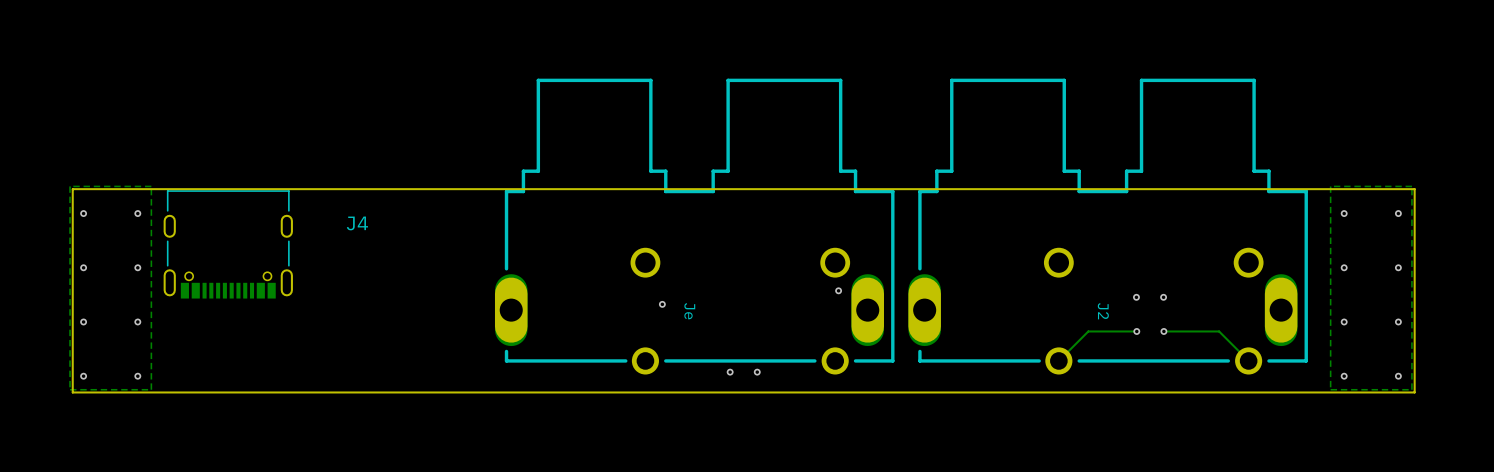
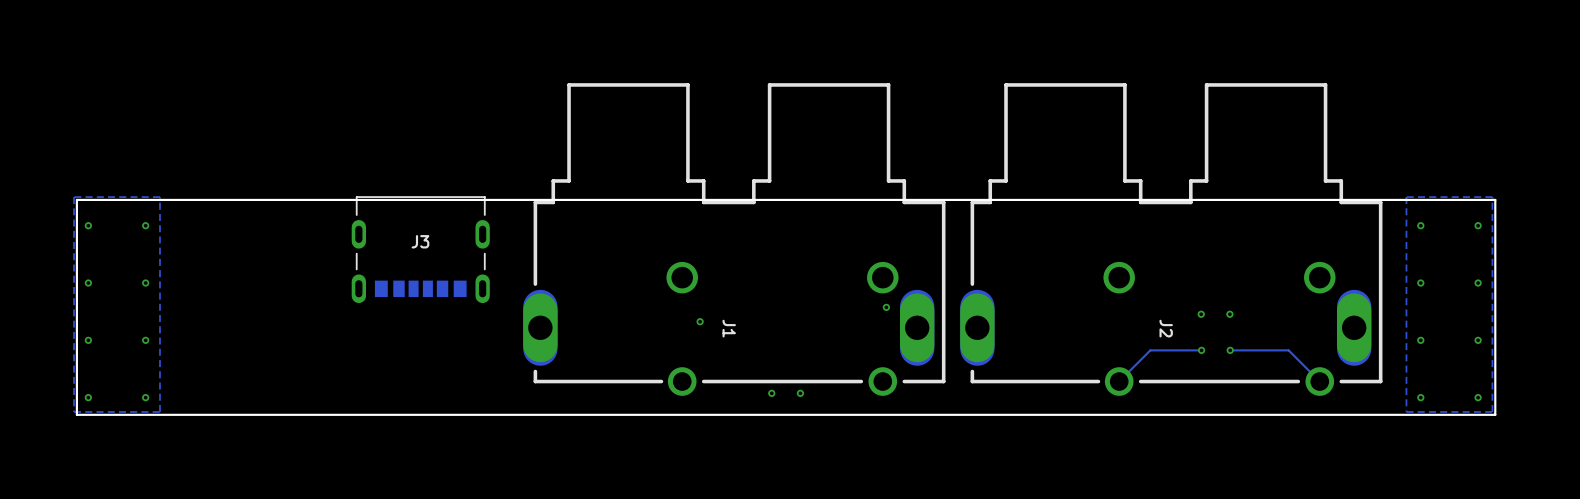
J3: none -> (420, 249)
J4: (228, 244) -> none
Je name: Je (689, 311) -> J1 (729, 328)

